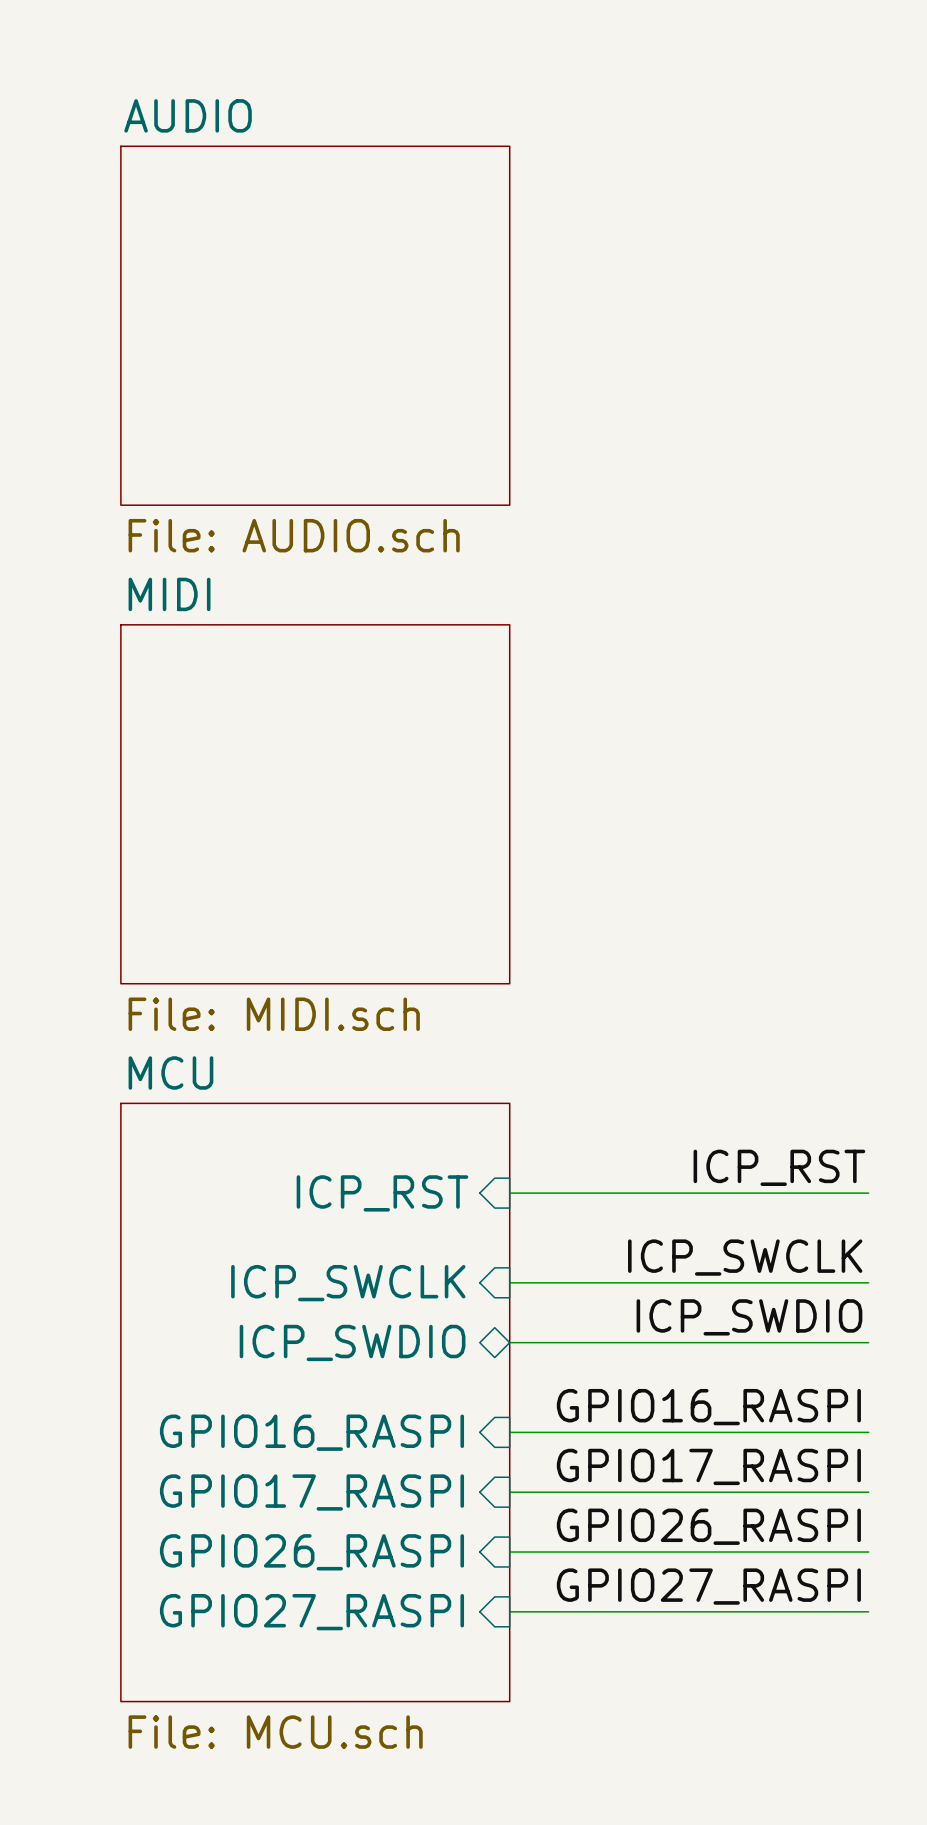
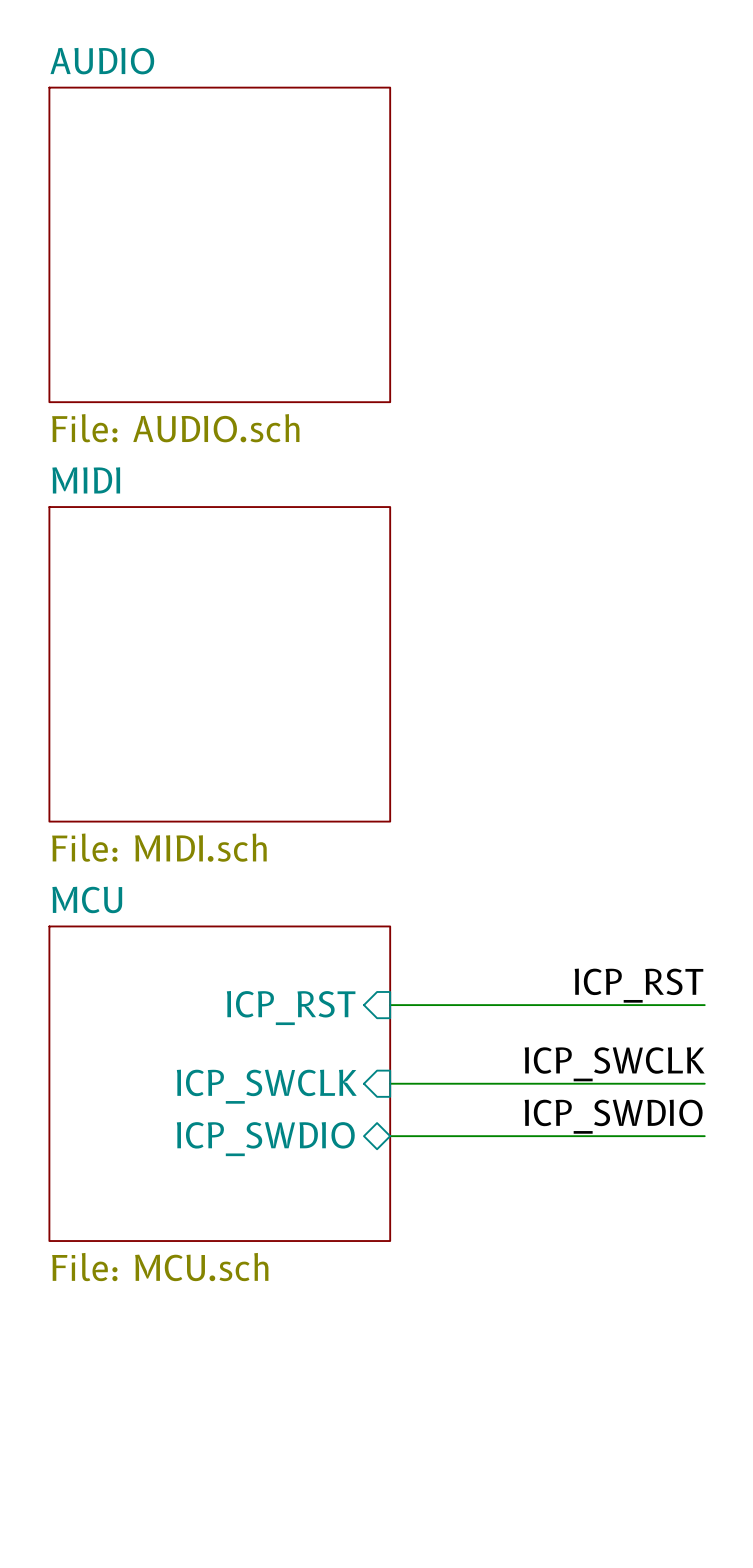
sheet MCU: none -> File: MCU.sch (219, 1083)
sheet MCU: File: MCU.sch (315, 1402) -> none
label: GPIO16_RASPI (708, 1407) -> none
sheet pin: GPIO16_RASPI (311, 1432) -> none
wire: (509, 1432) (868, 1432) -> none
label: GPIO17_RASPI (708, 1466) -> none
sheet pin: GPIO17_RASPI (311, 1492) -> none
wire: (509, 1492) (868, 1492) -> none
label: GPIO26_RASPI (708, 1526) -> none
sheet pin: GPIO26_RASPI (311, 1552) -> none
wire: (509, 1552) (868, 1552) -> none
label: GPIO27_RASPI (708, 1586) -> none
wire: (509, 1611) (868, 1611) -> none
sheet pin: GPIO27_RASPI (311, 1612) -> none

